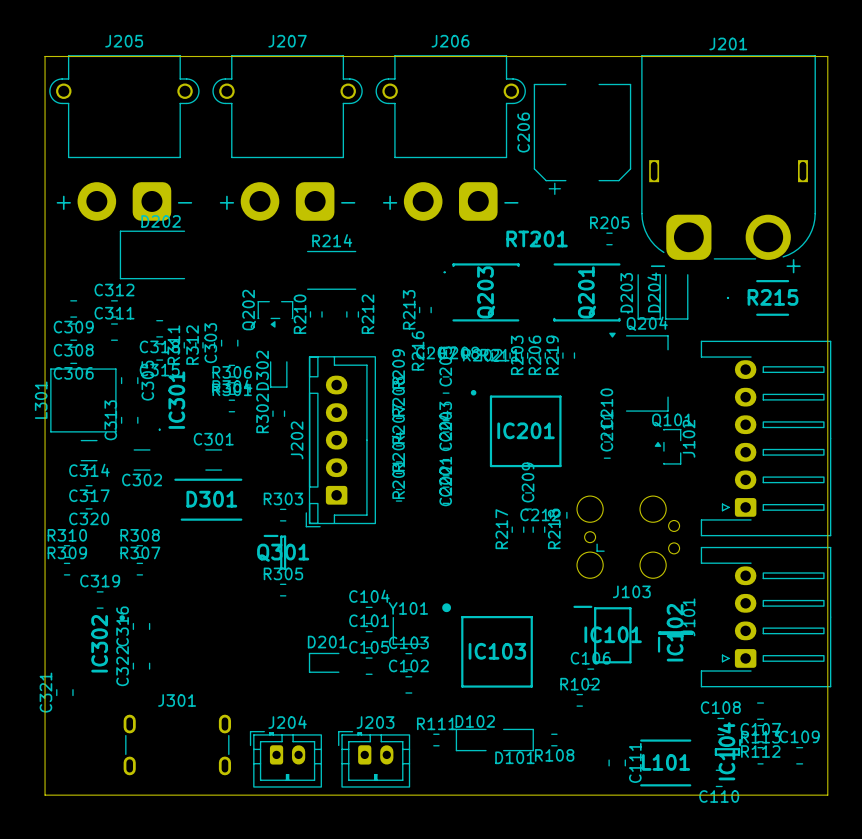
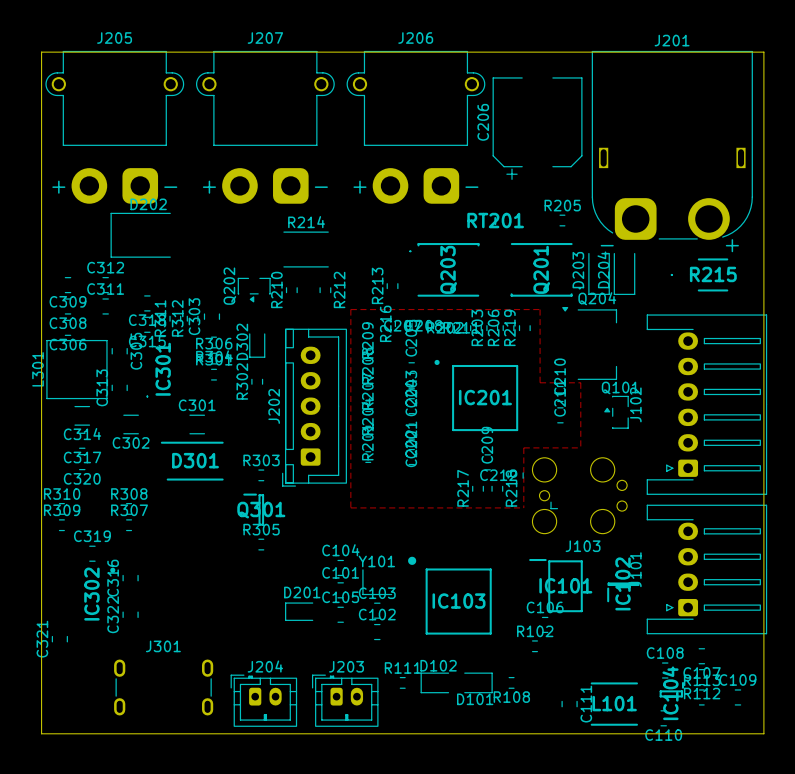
zone outline: none -> (350, 309) (540, 309) (540, 382) (580, 382) (580, 447) (523, 447) (523, 507) (350, 507) (350, 309)

